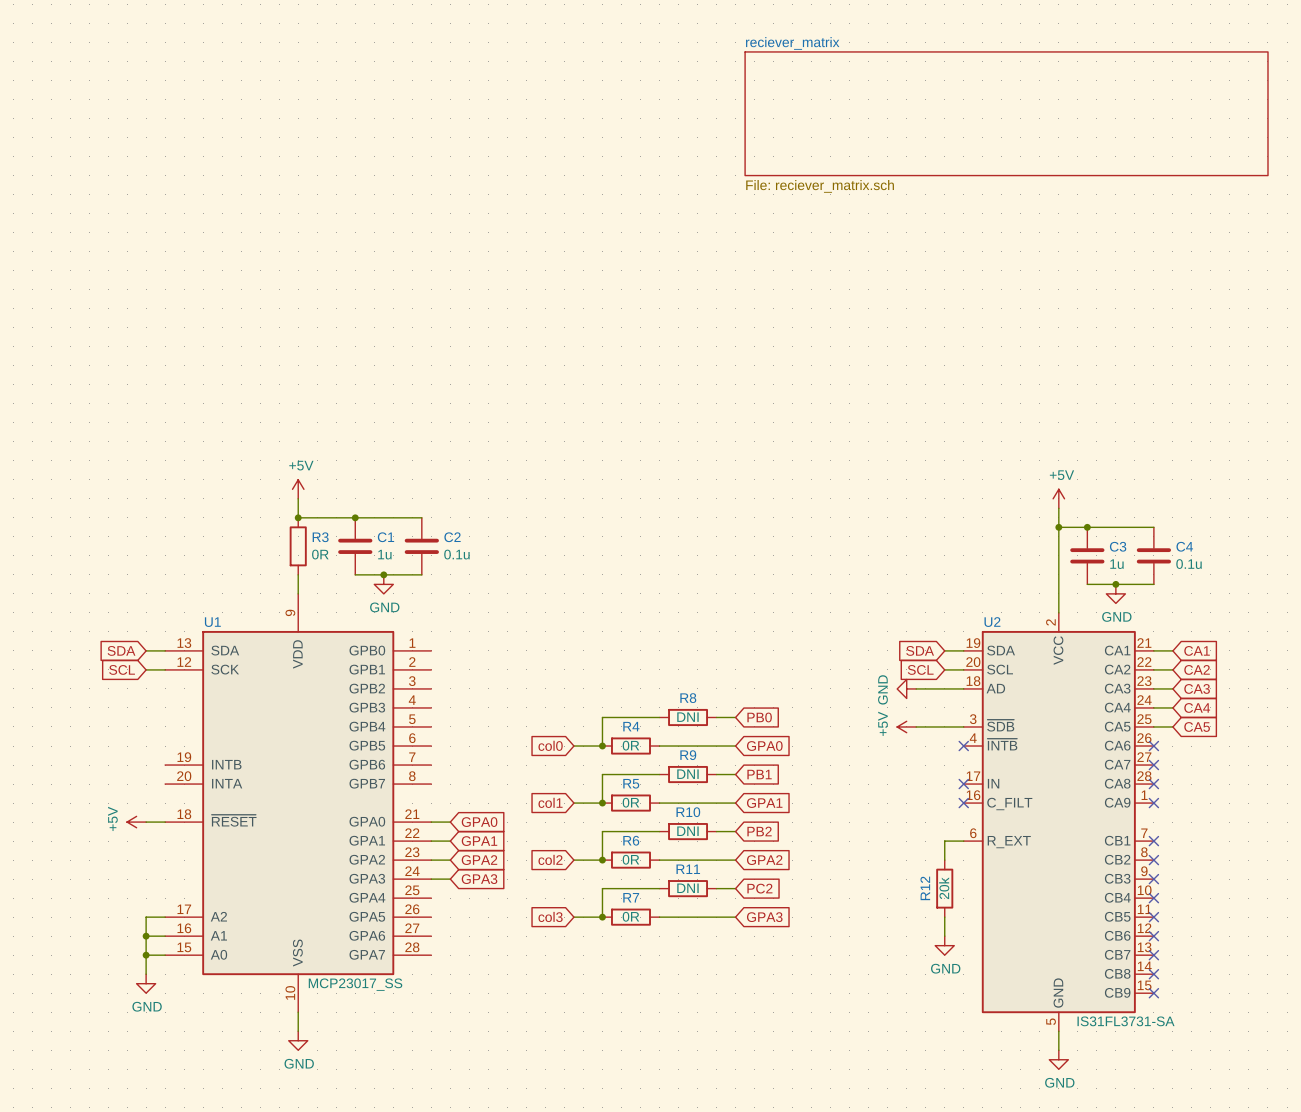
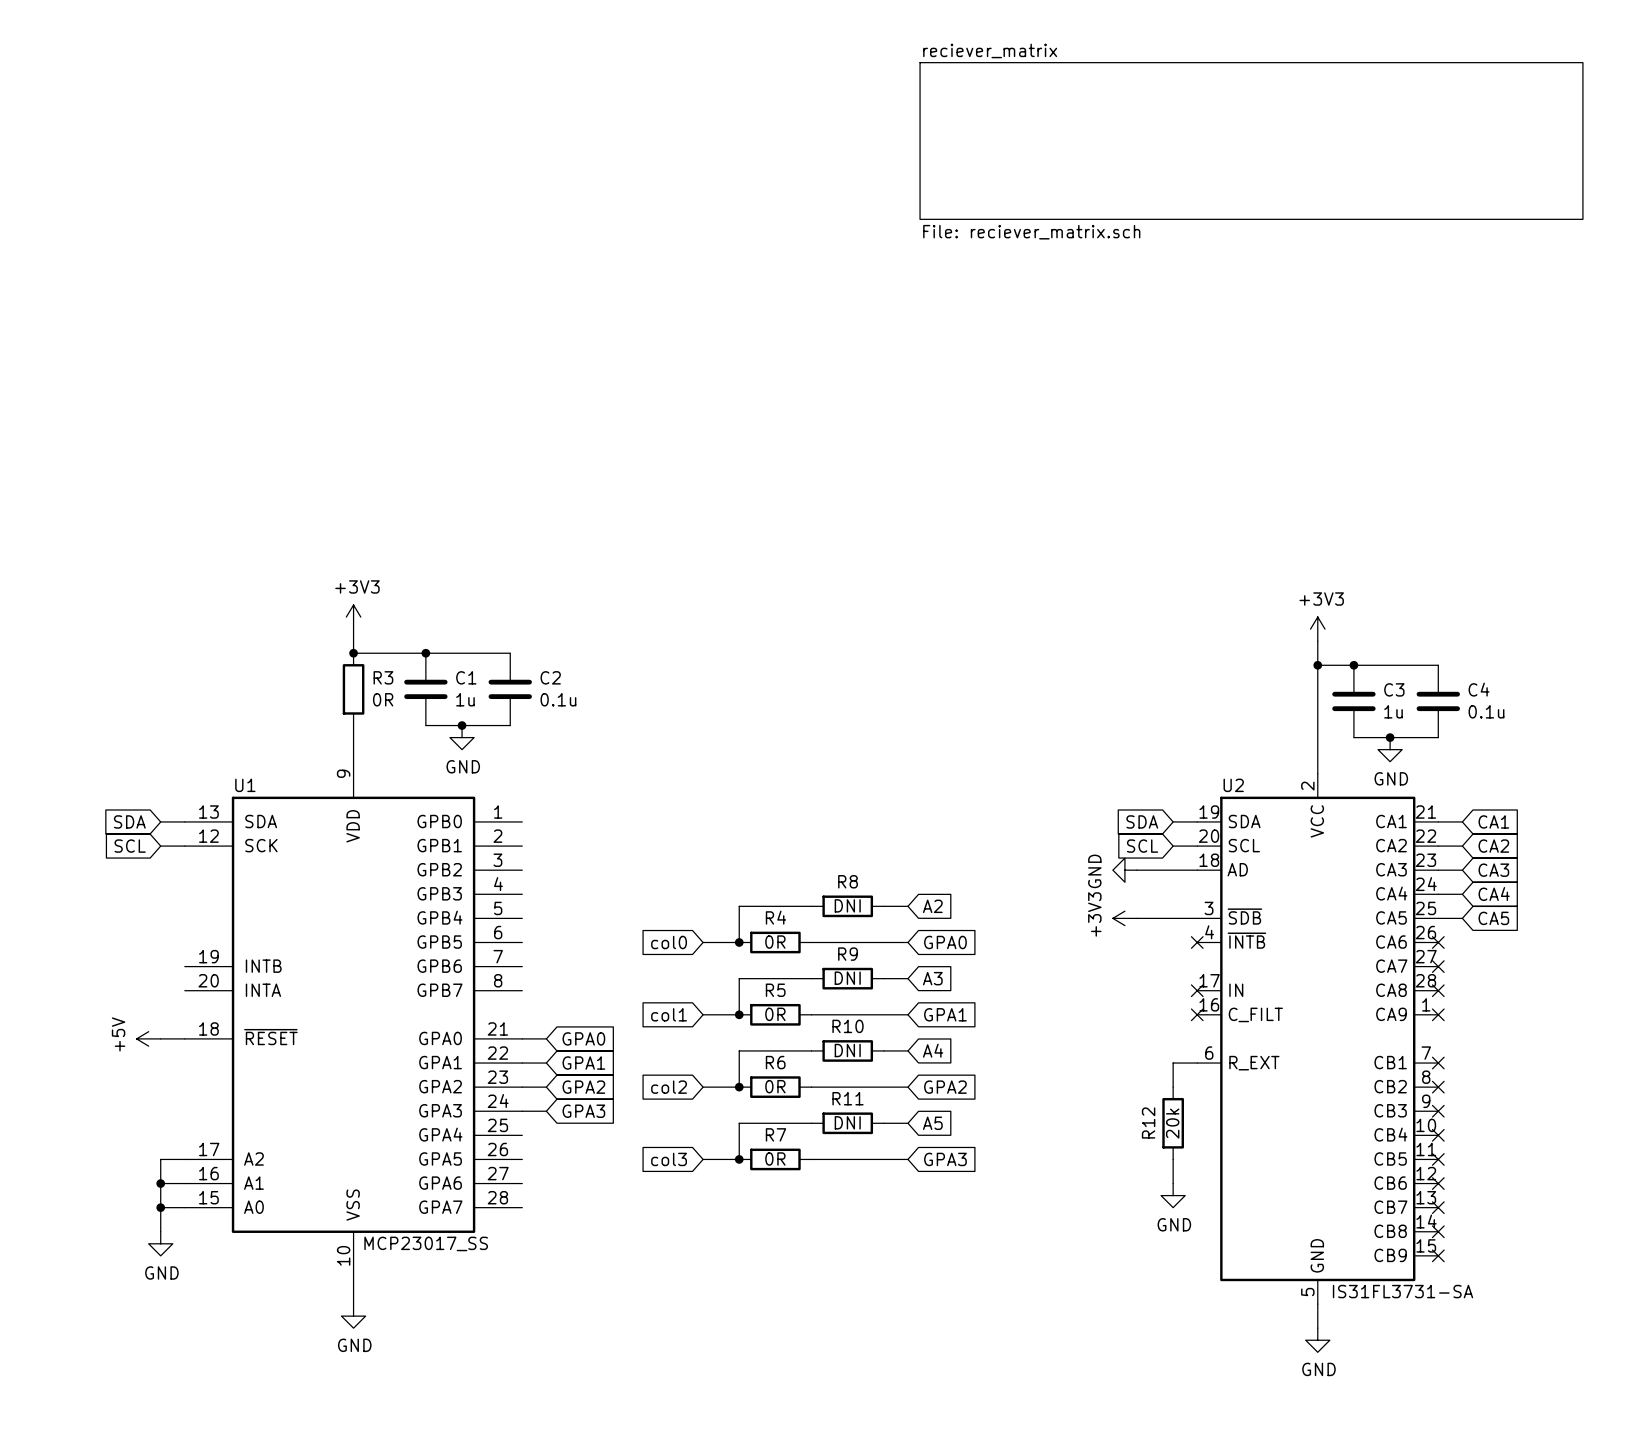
power symbol: +5V (298, 489) -> +3V3 (353, 617)
power symbol: +5V (1058, 498) -> +3V3 (1317, 629)
global label: PB0 (759, 717) -> A2 (932, 906)
power symbol: +5V (906, 726) -> +3V3 (1124, 918)
global label: PB1 (759, 774) -> A3 (932, 978)
global label: PB2 (759, 831) -> A4 (933, 1050)
global label: PC2 (759, 888) -> A5 (932, 1123)

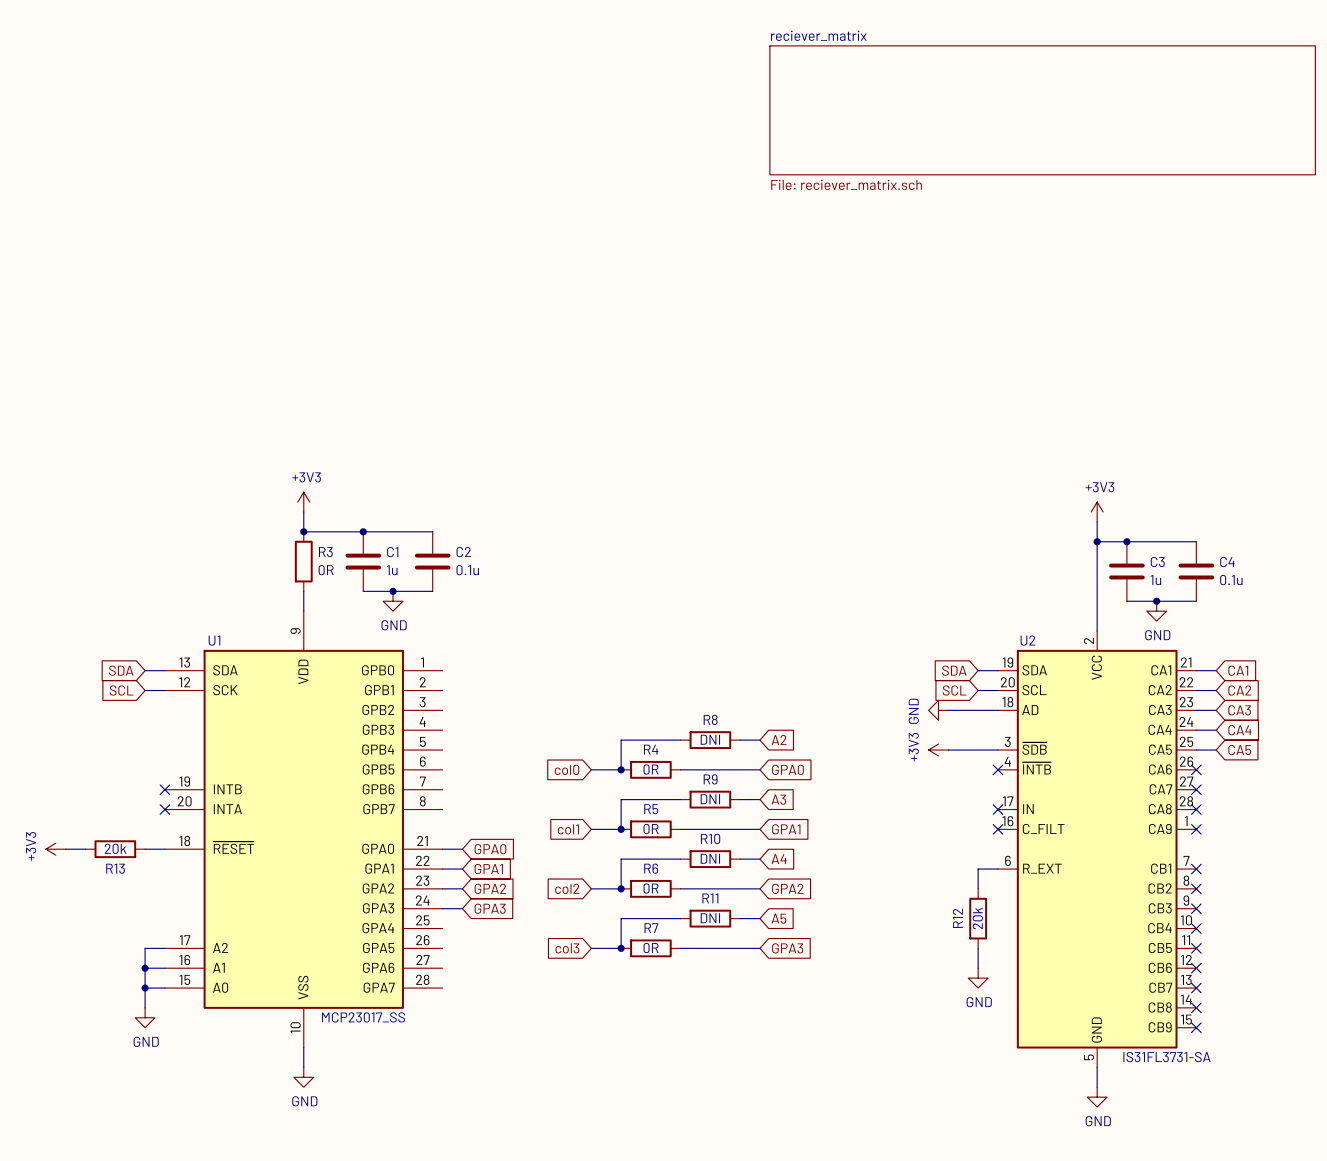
no-connect mark: none -> (164, 789)
no-connect mark: none -> (164, 809)
power symbol: none -> +3V3 (55, 849)
wire: none -> (65, 849) (85, 849)
R13: none -> 20k (115, 849)
power symbol: +5V (148, 1038) -> none

